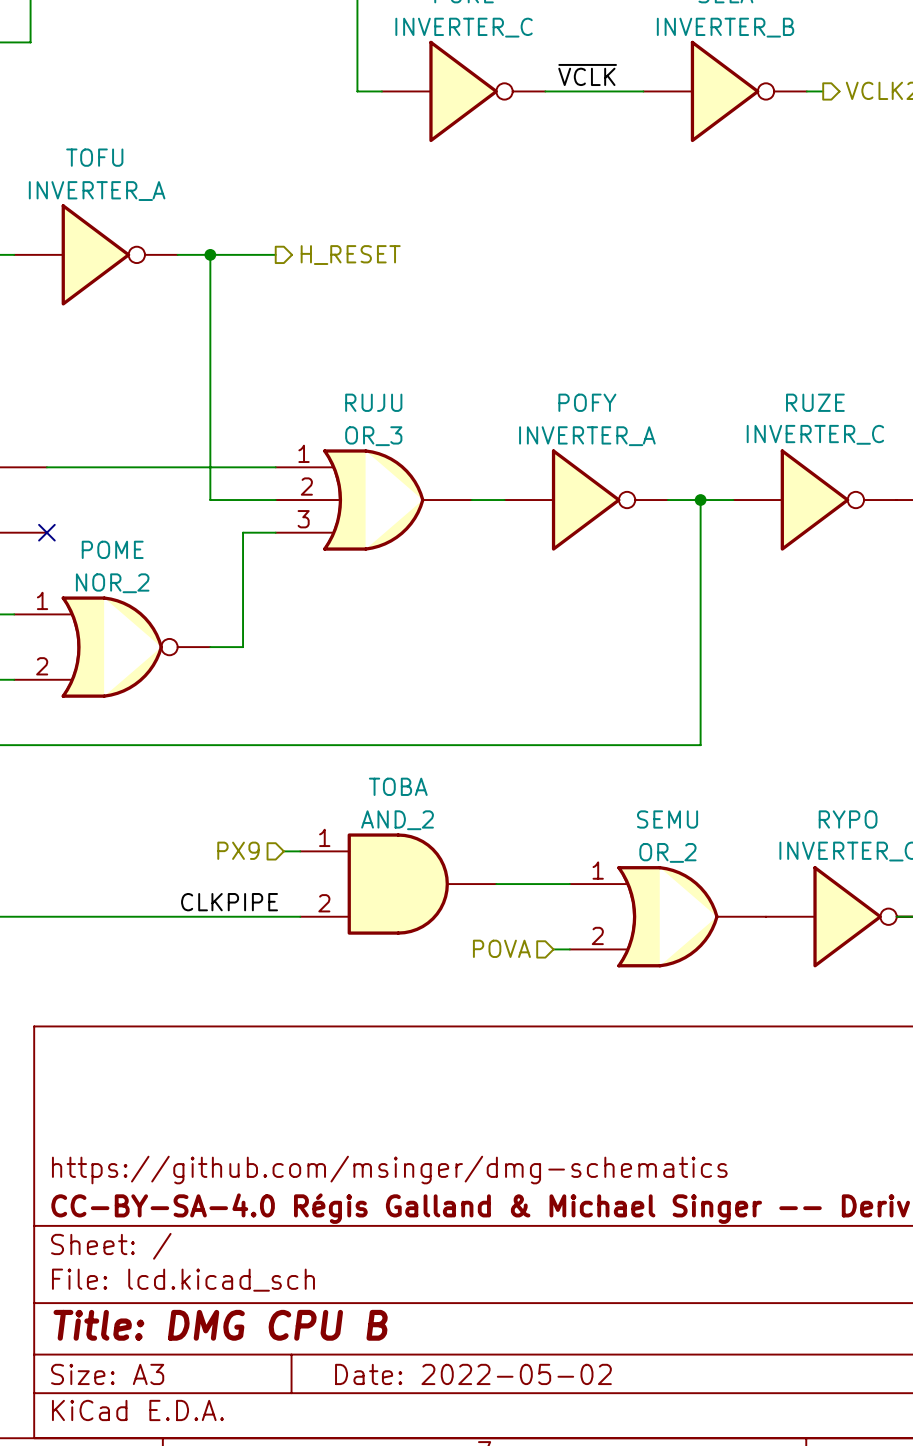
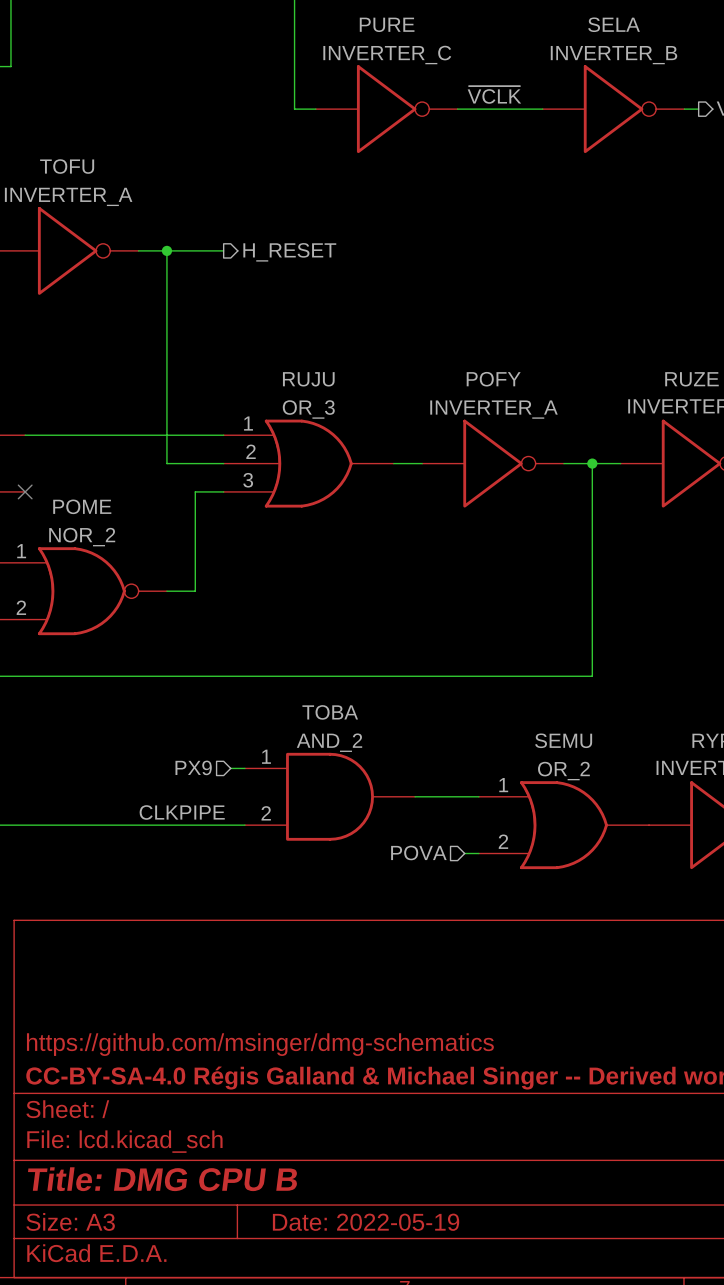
title block: Date: 2022-05-02 (473, 1374) -> Date: 2022-05-19 (366, 1222)

